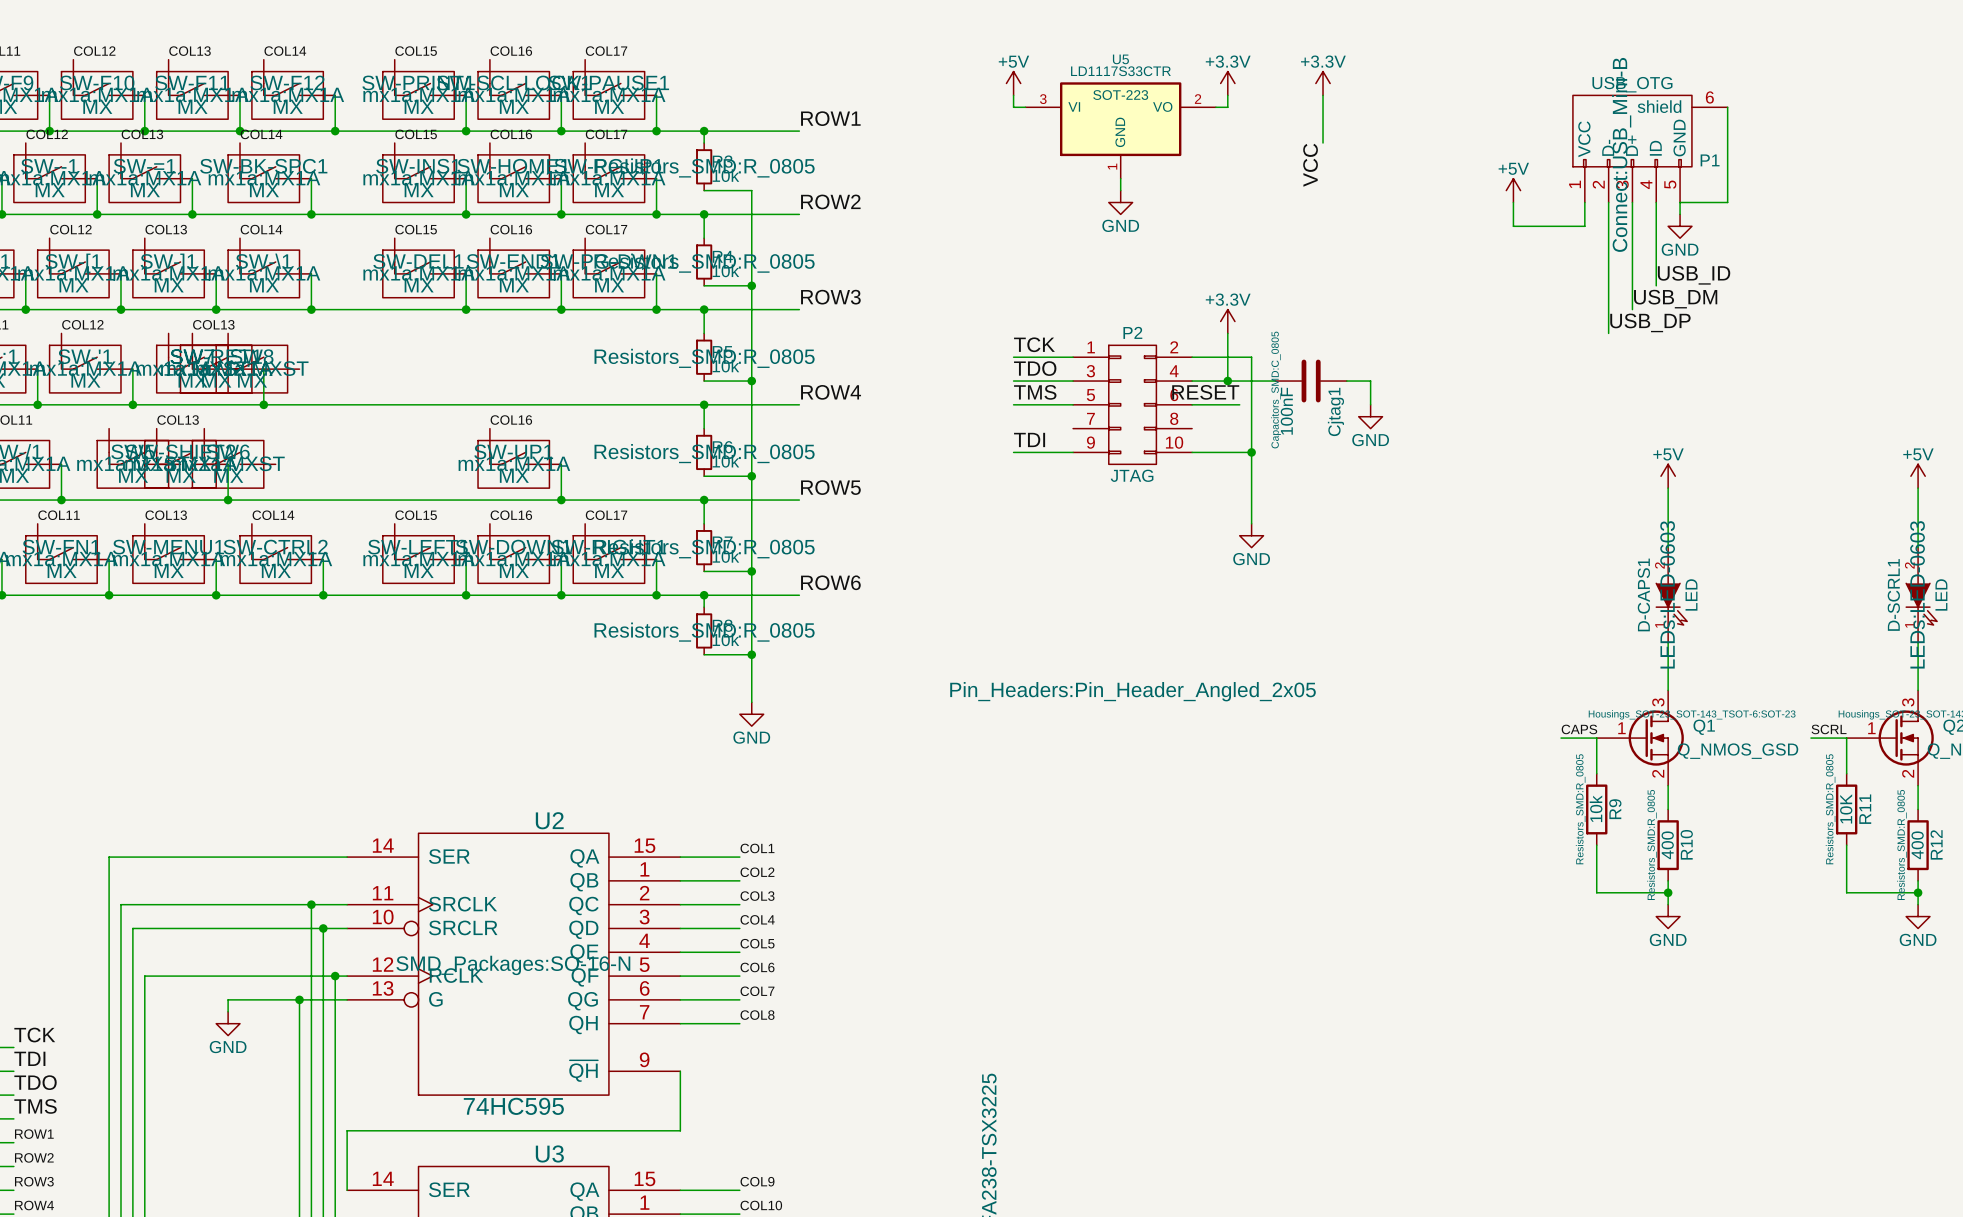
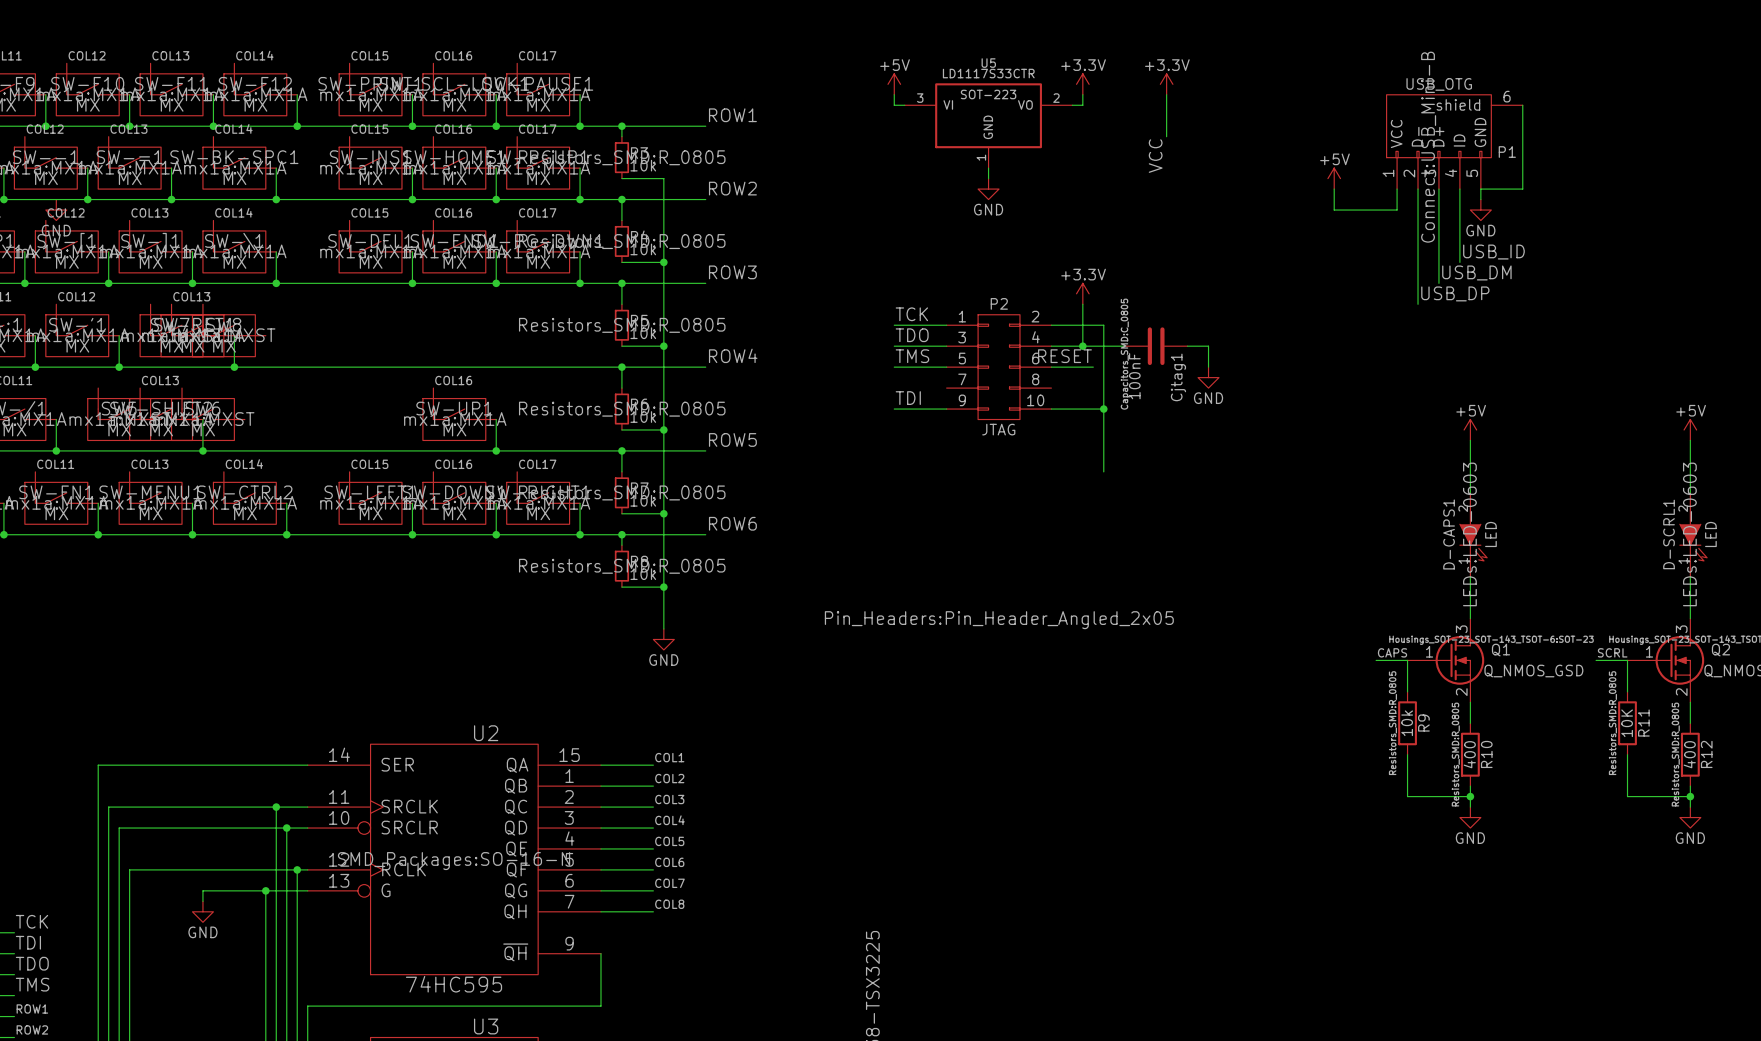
power symbol: none -> GND (56, 210)
power symbol: GND (1251, 535) -> none

